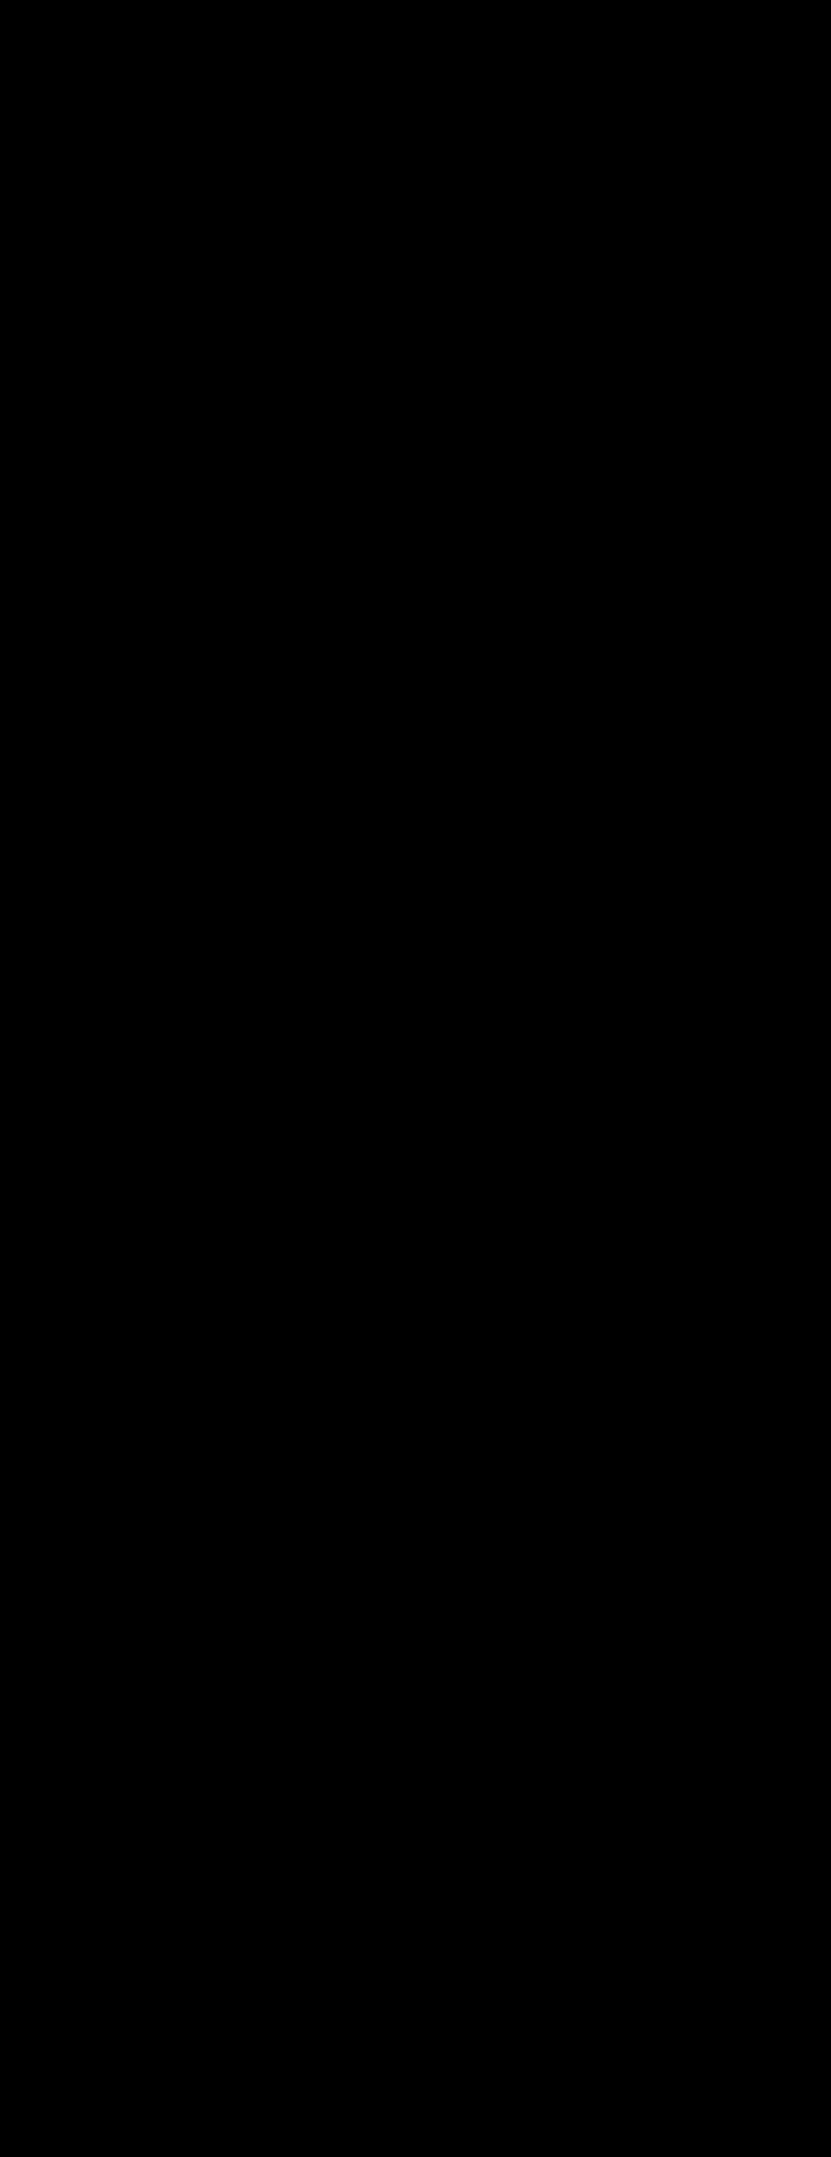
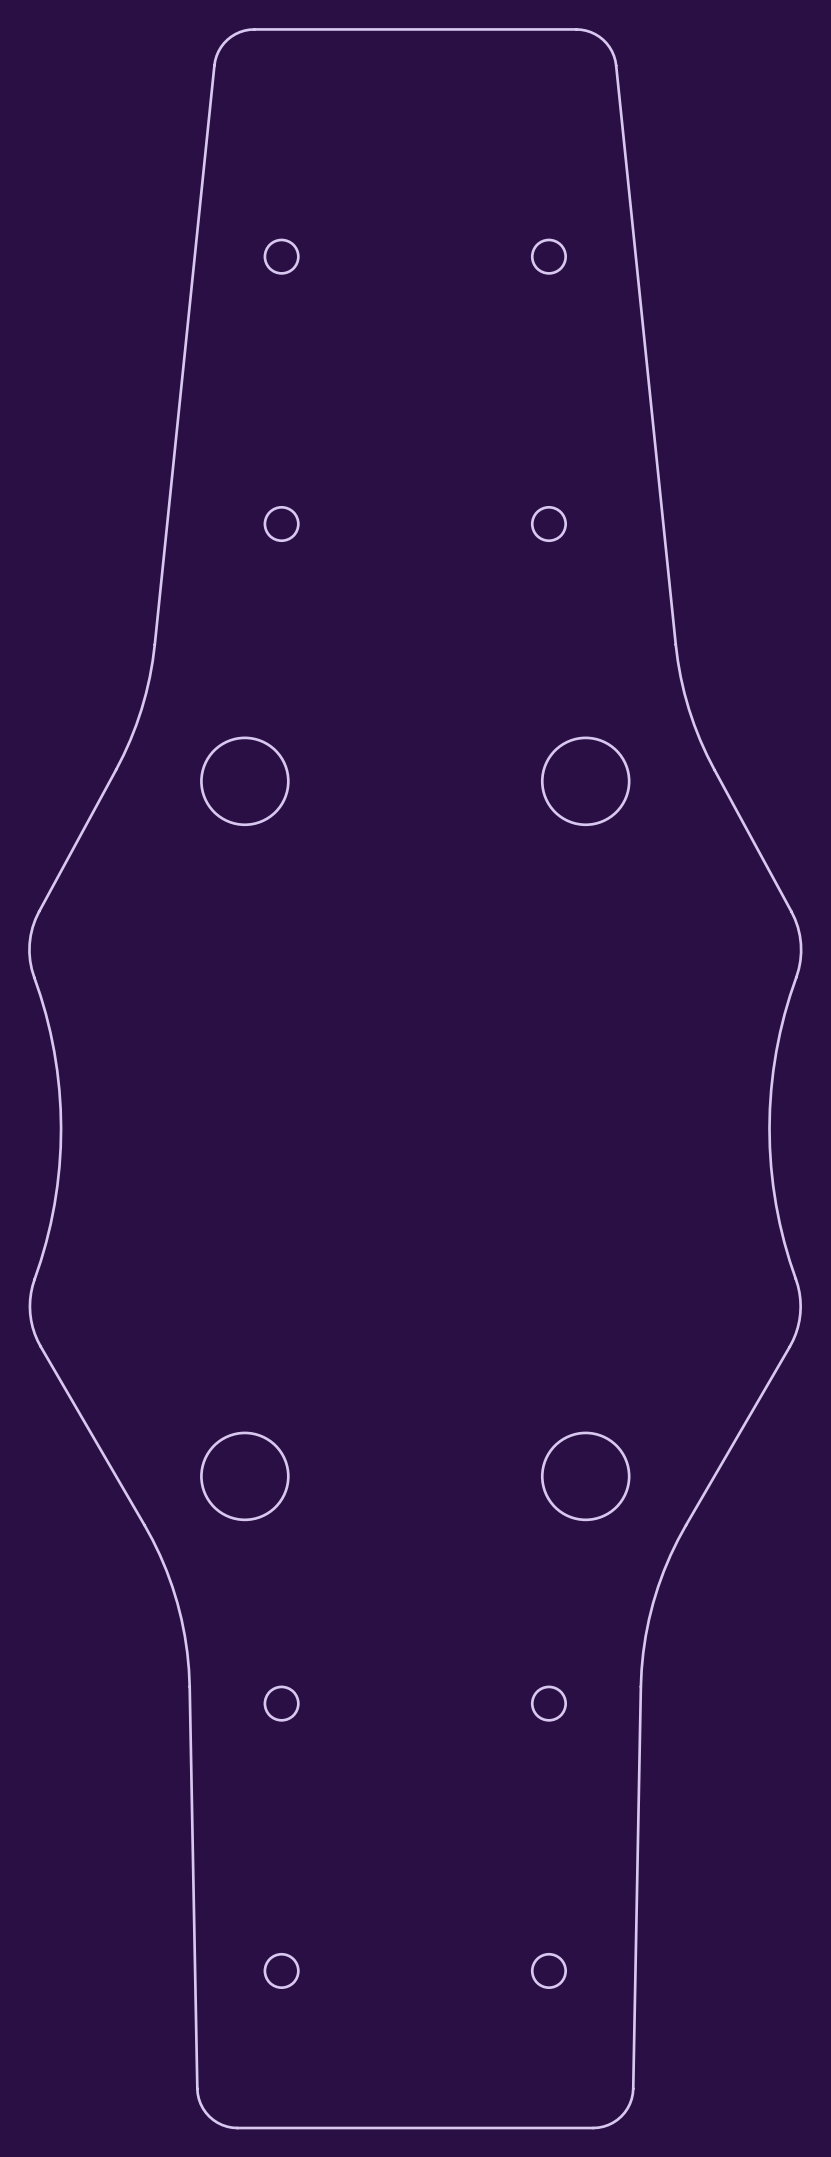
board edge: none -> (254, 29) (576, 29) (595, 34) (609, 47) (616, 65) (675, 644) (680, 677) (688, 709) (707, 755) (791, 911) (799, 935) (801, 952) (798, 969) (784, 1014) (776, 1051) (771, 1089) (769, 1128) (771, 1166) (776, 1204) (784, 1242) (799, 1292) (799, 1320) (789, 1346) (677, 1539) (658, 1586) (649, 1619) (643, 1652) (640, 1686) (632, 2093) (629, 2103) (621, 2116) (608, 2125) (598, 2127) (237, 2128) (222, 2125) (205, 2112) (200, 2103) (197, 2088) (189, 1686) (187, 1652) (181, 1619) (166, 1570) (152, 1539) (40, 1346) (31, 1320) (31, 1292) (46, 1242) (54, 1204) (59, 1166) (61, 1128) (59, 1089) (54, 1051) (45, 1014) (31, 969) (29, 952) (30, 935) (39, 911) (123, 755) (136, 724) (146, 693) (154, 644) (214, 65) (218, 51) (227, 39) (239, 32) (254, 29)
round board edge: none -> [263, 238, 300, 275]
round board edge: none -> [530, 238, 568, 275]
round board edge: none -> [263, 505, 300, 543]
round board edge: none -> [530, 505, 568, 543]
round board edge: none -> [200, 736, 290, 827]
round board edge: none -> [540, 736, 631, 827]
round board edge: none -> [200, 1431, 290, 1522]
round board edge: none -> [540, 1431, 631, 1522]
round board edge: none -> [263, 1685, 300, 1722]
round board edge: none -> [530, 1685, 568, 1722]
round board edge: none -> [263, 1952, 300, 1990]
round board edge: none -> [530, 1952, 568, 1990]

